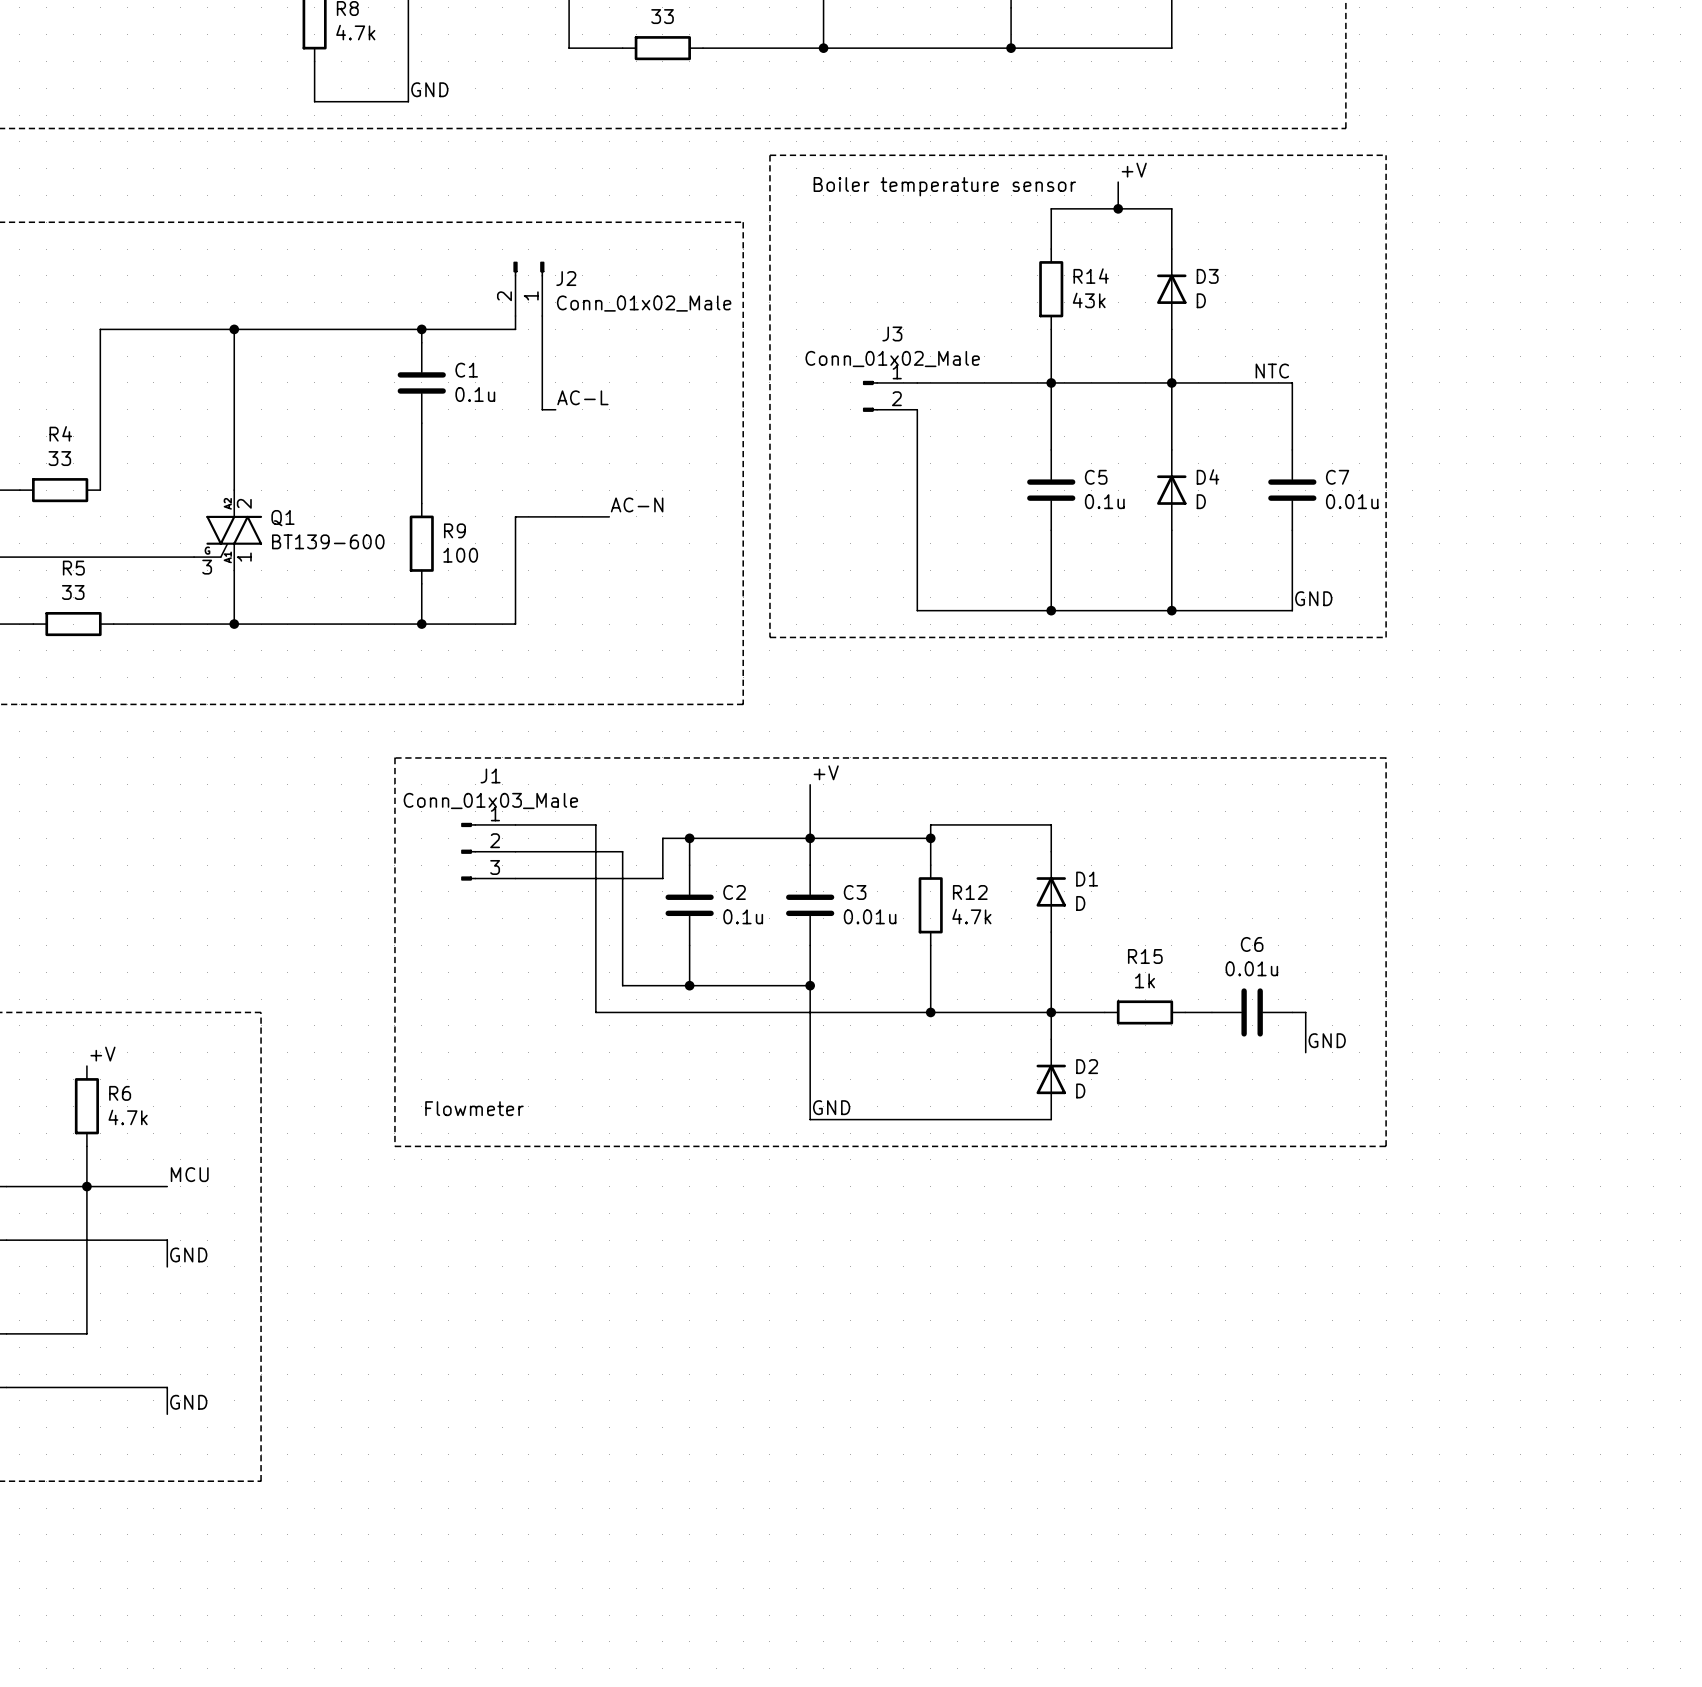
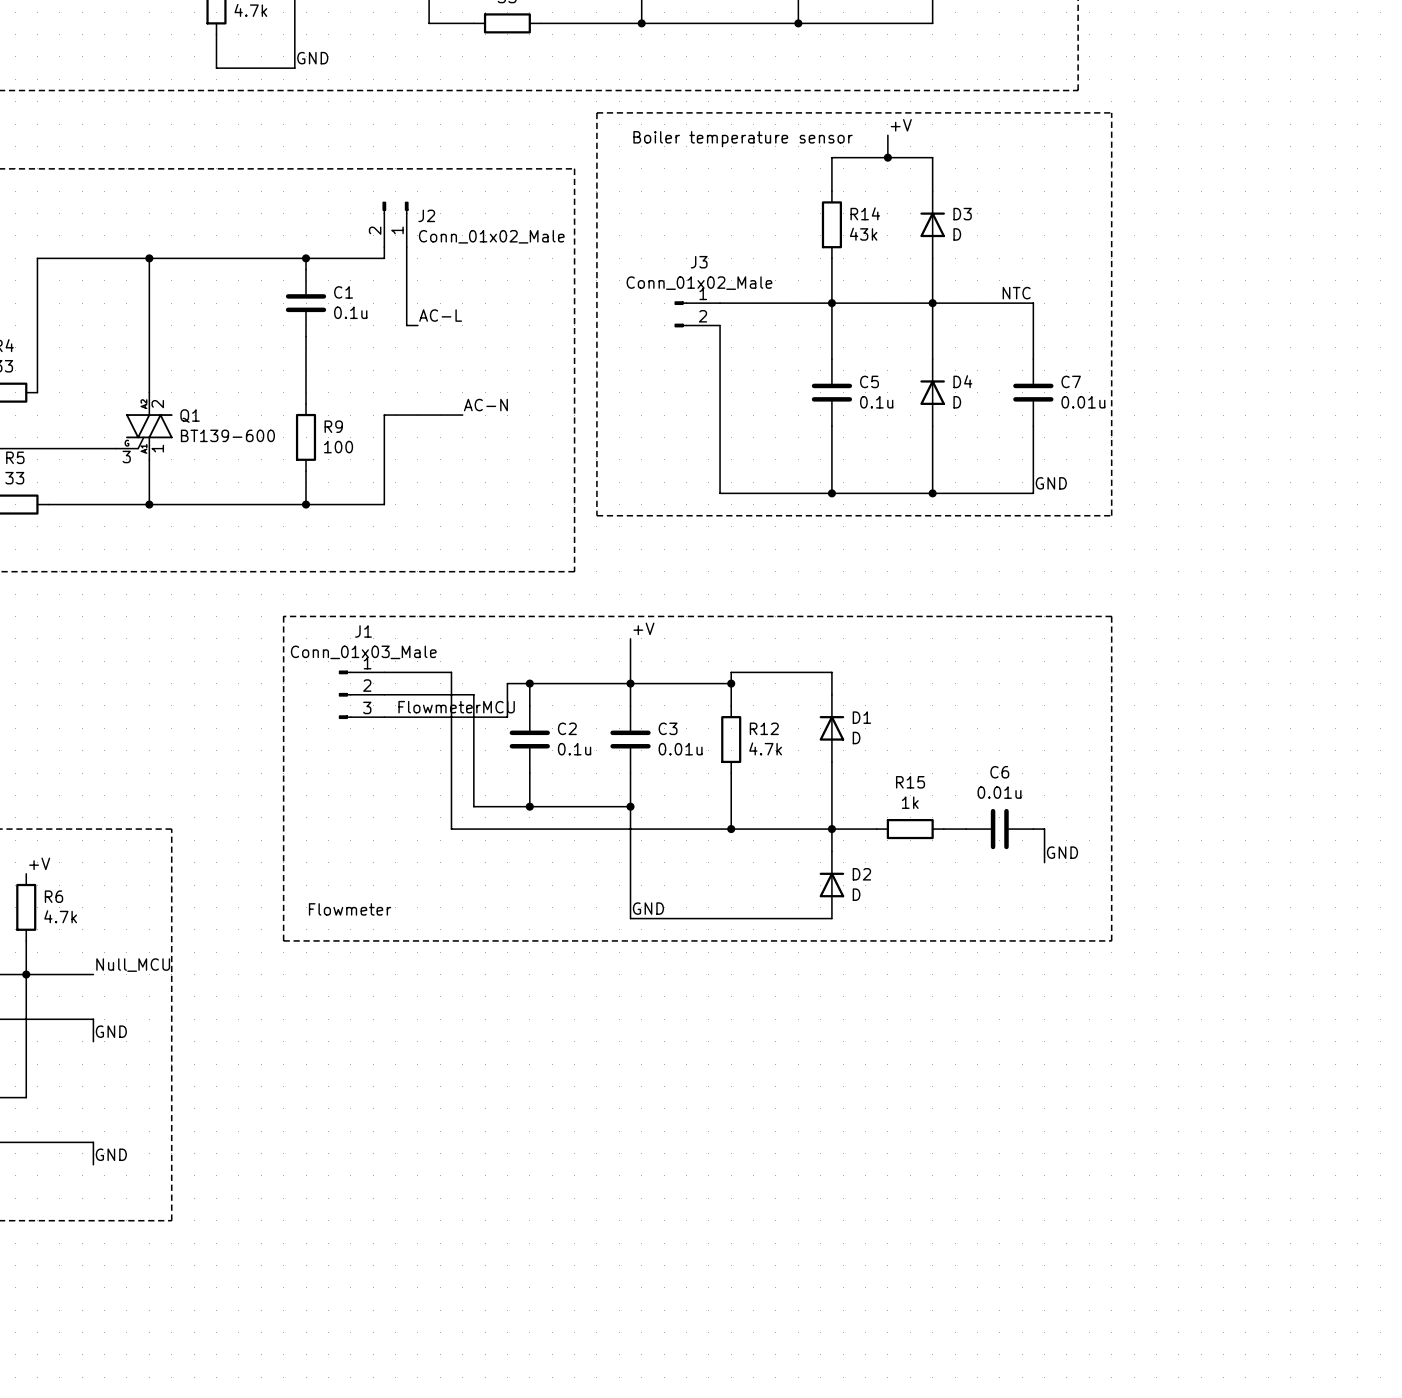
label: none -> FlowmeterMCU (456, 707)
label: MCU (189, 1174) -> Null_MCU (133, 965)

